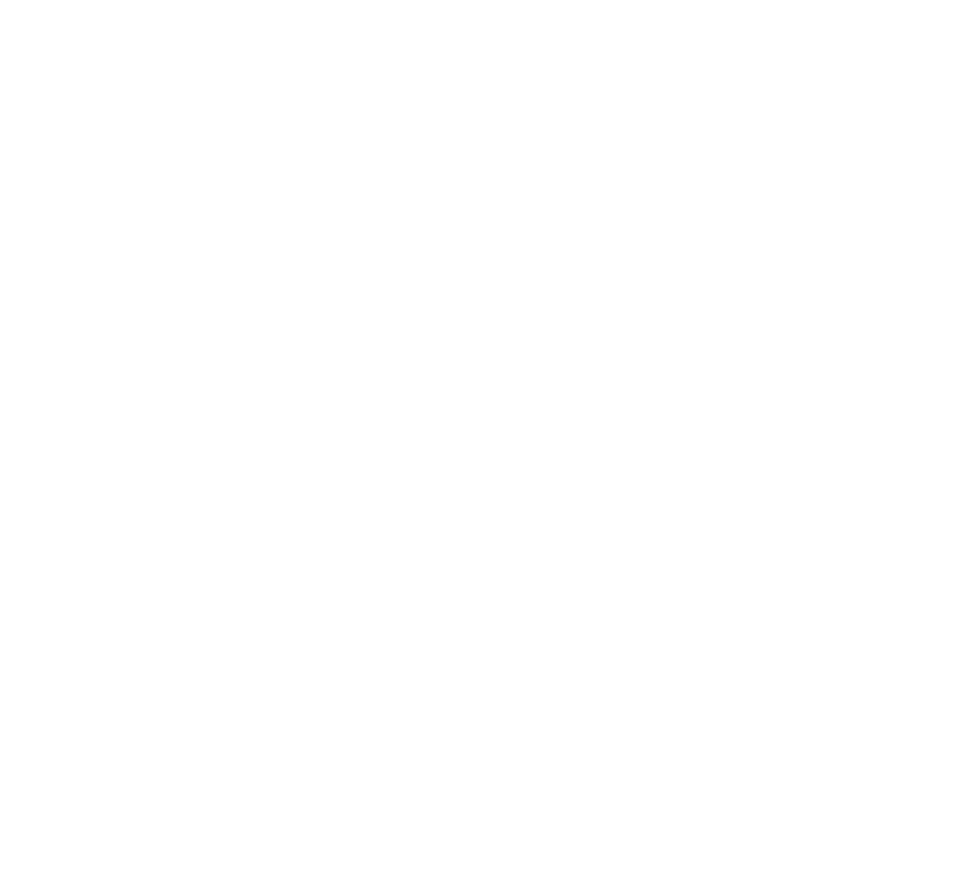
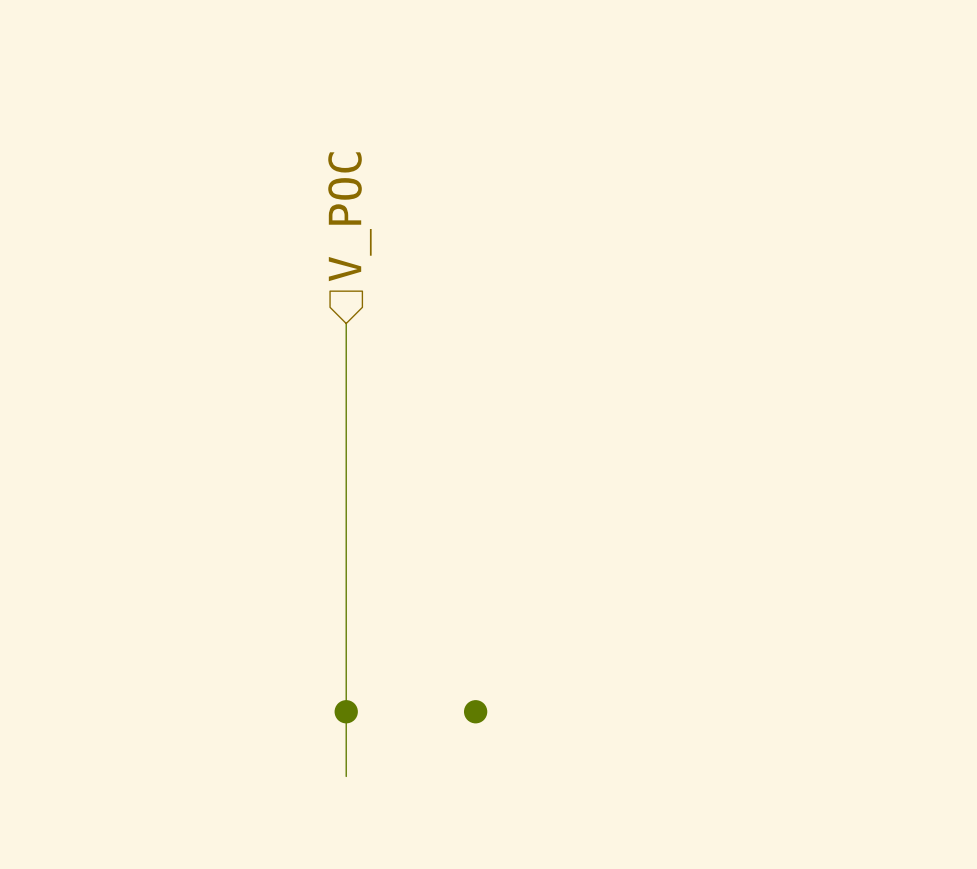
hierarchical label: none -> V_POC (349, 216)
wire: none -> (346, 323) (346, 776)
junction: none -> (346, 711)
junction: none -> (475, 711)

